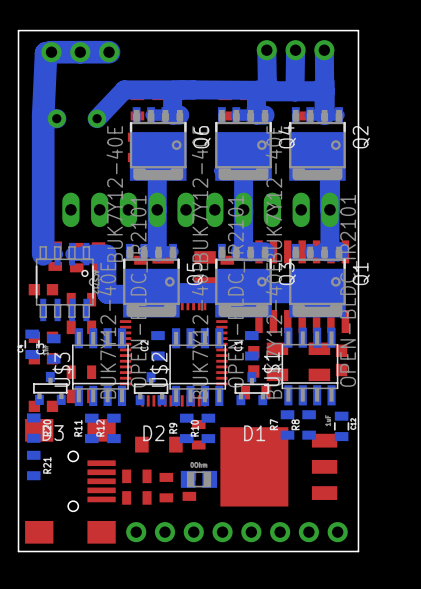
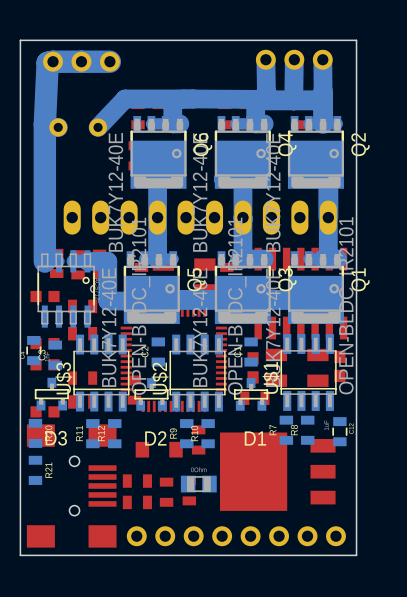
part: none -> (134, 390)

